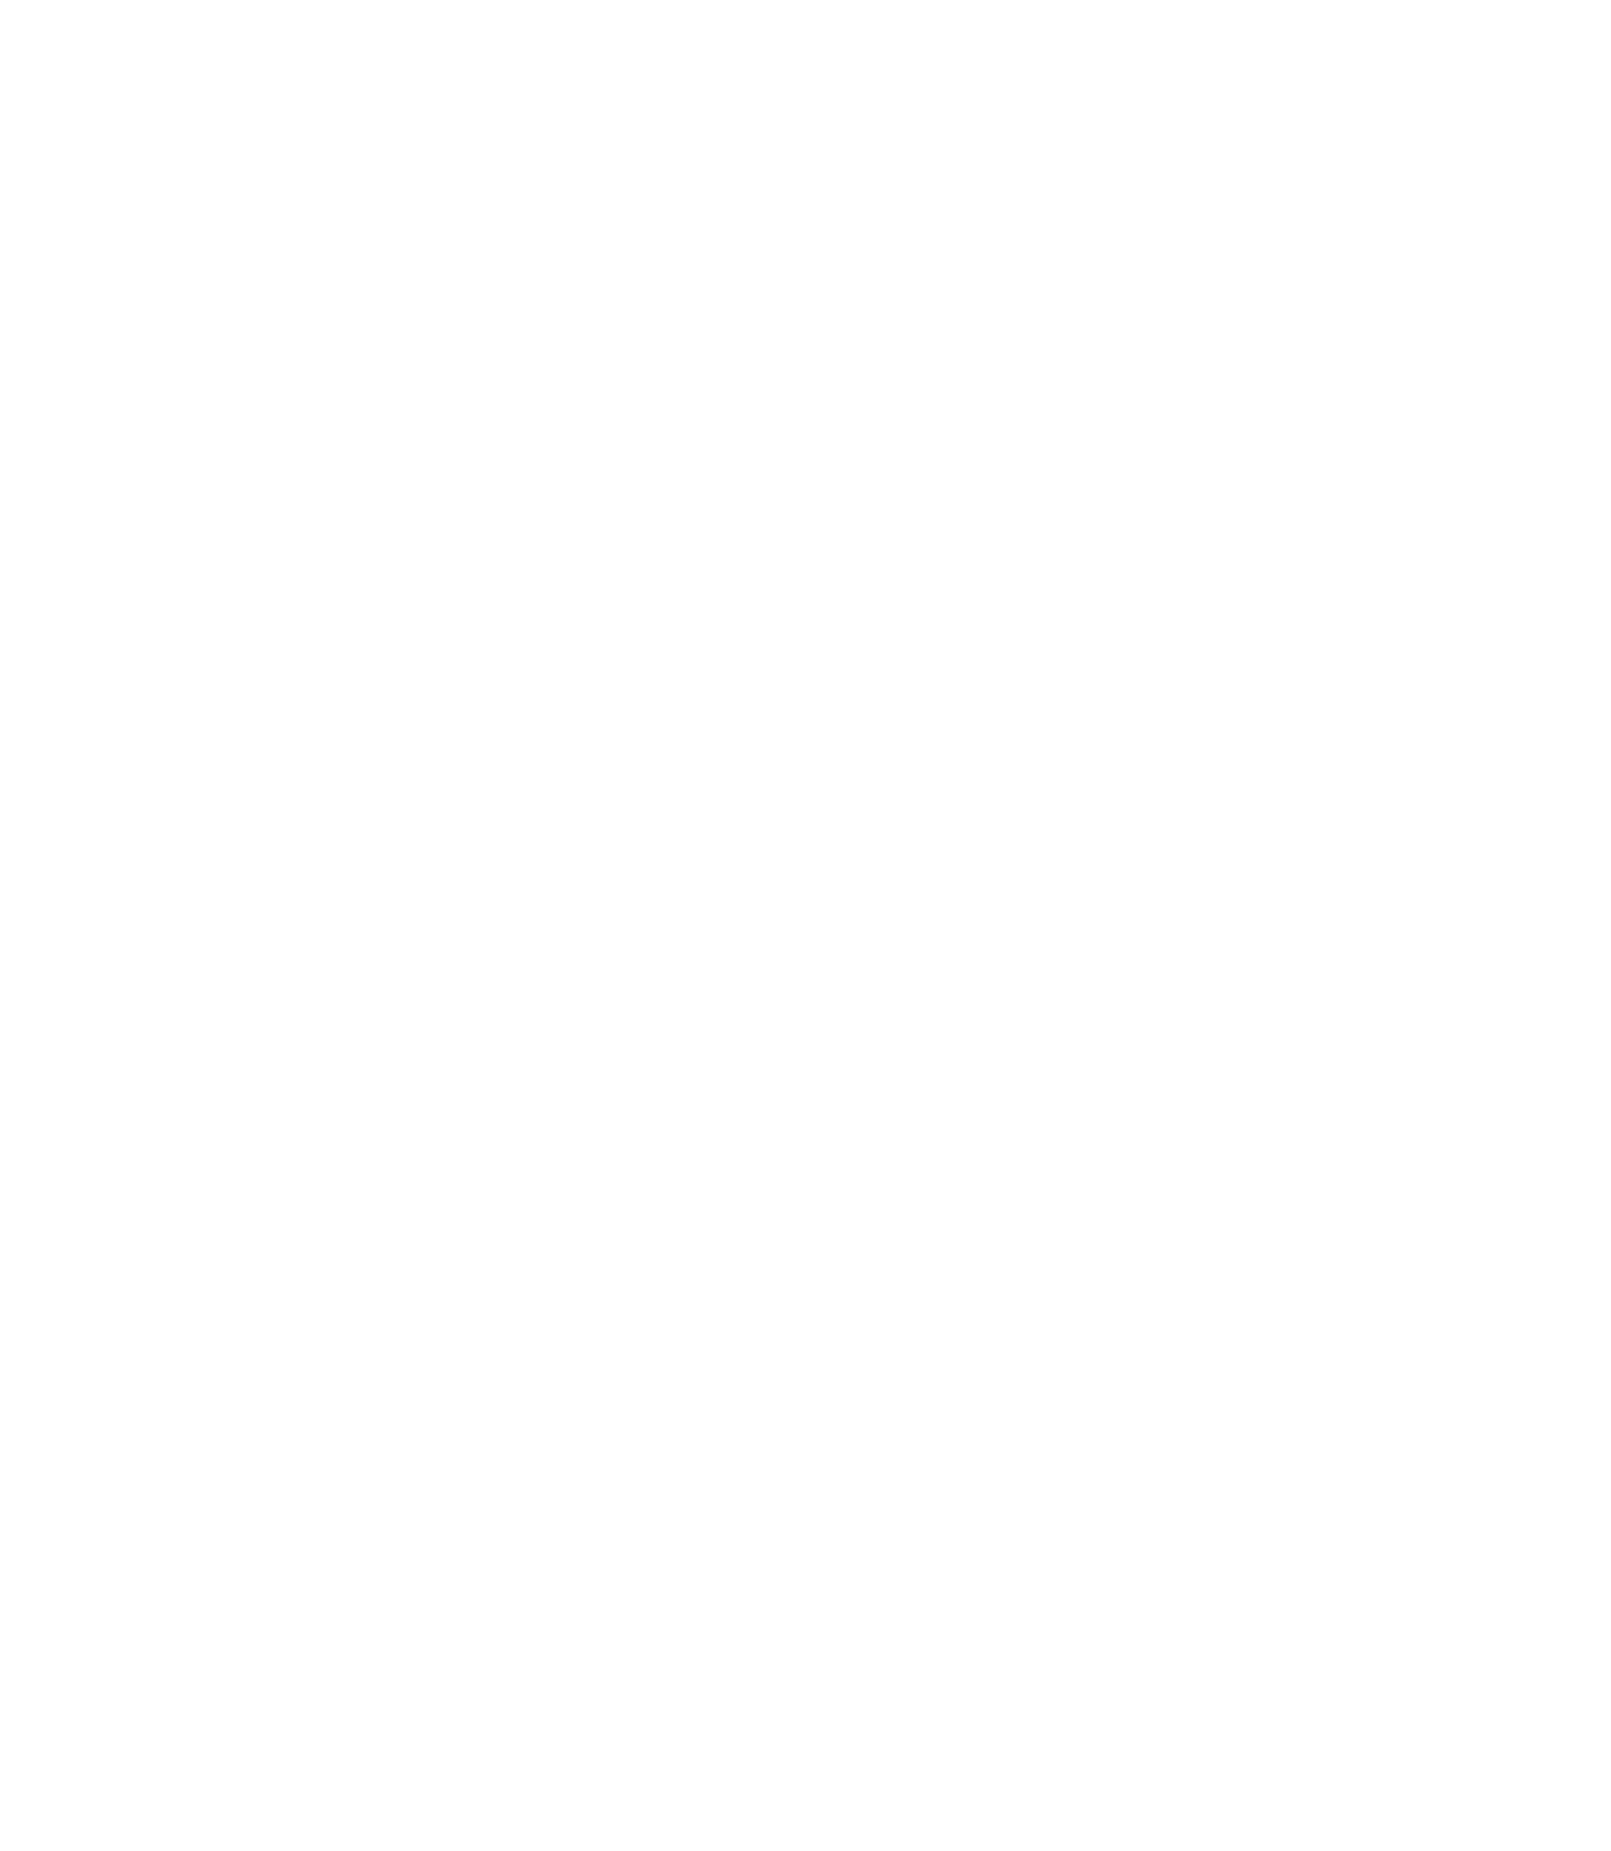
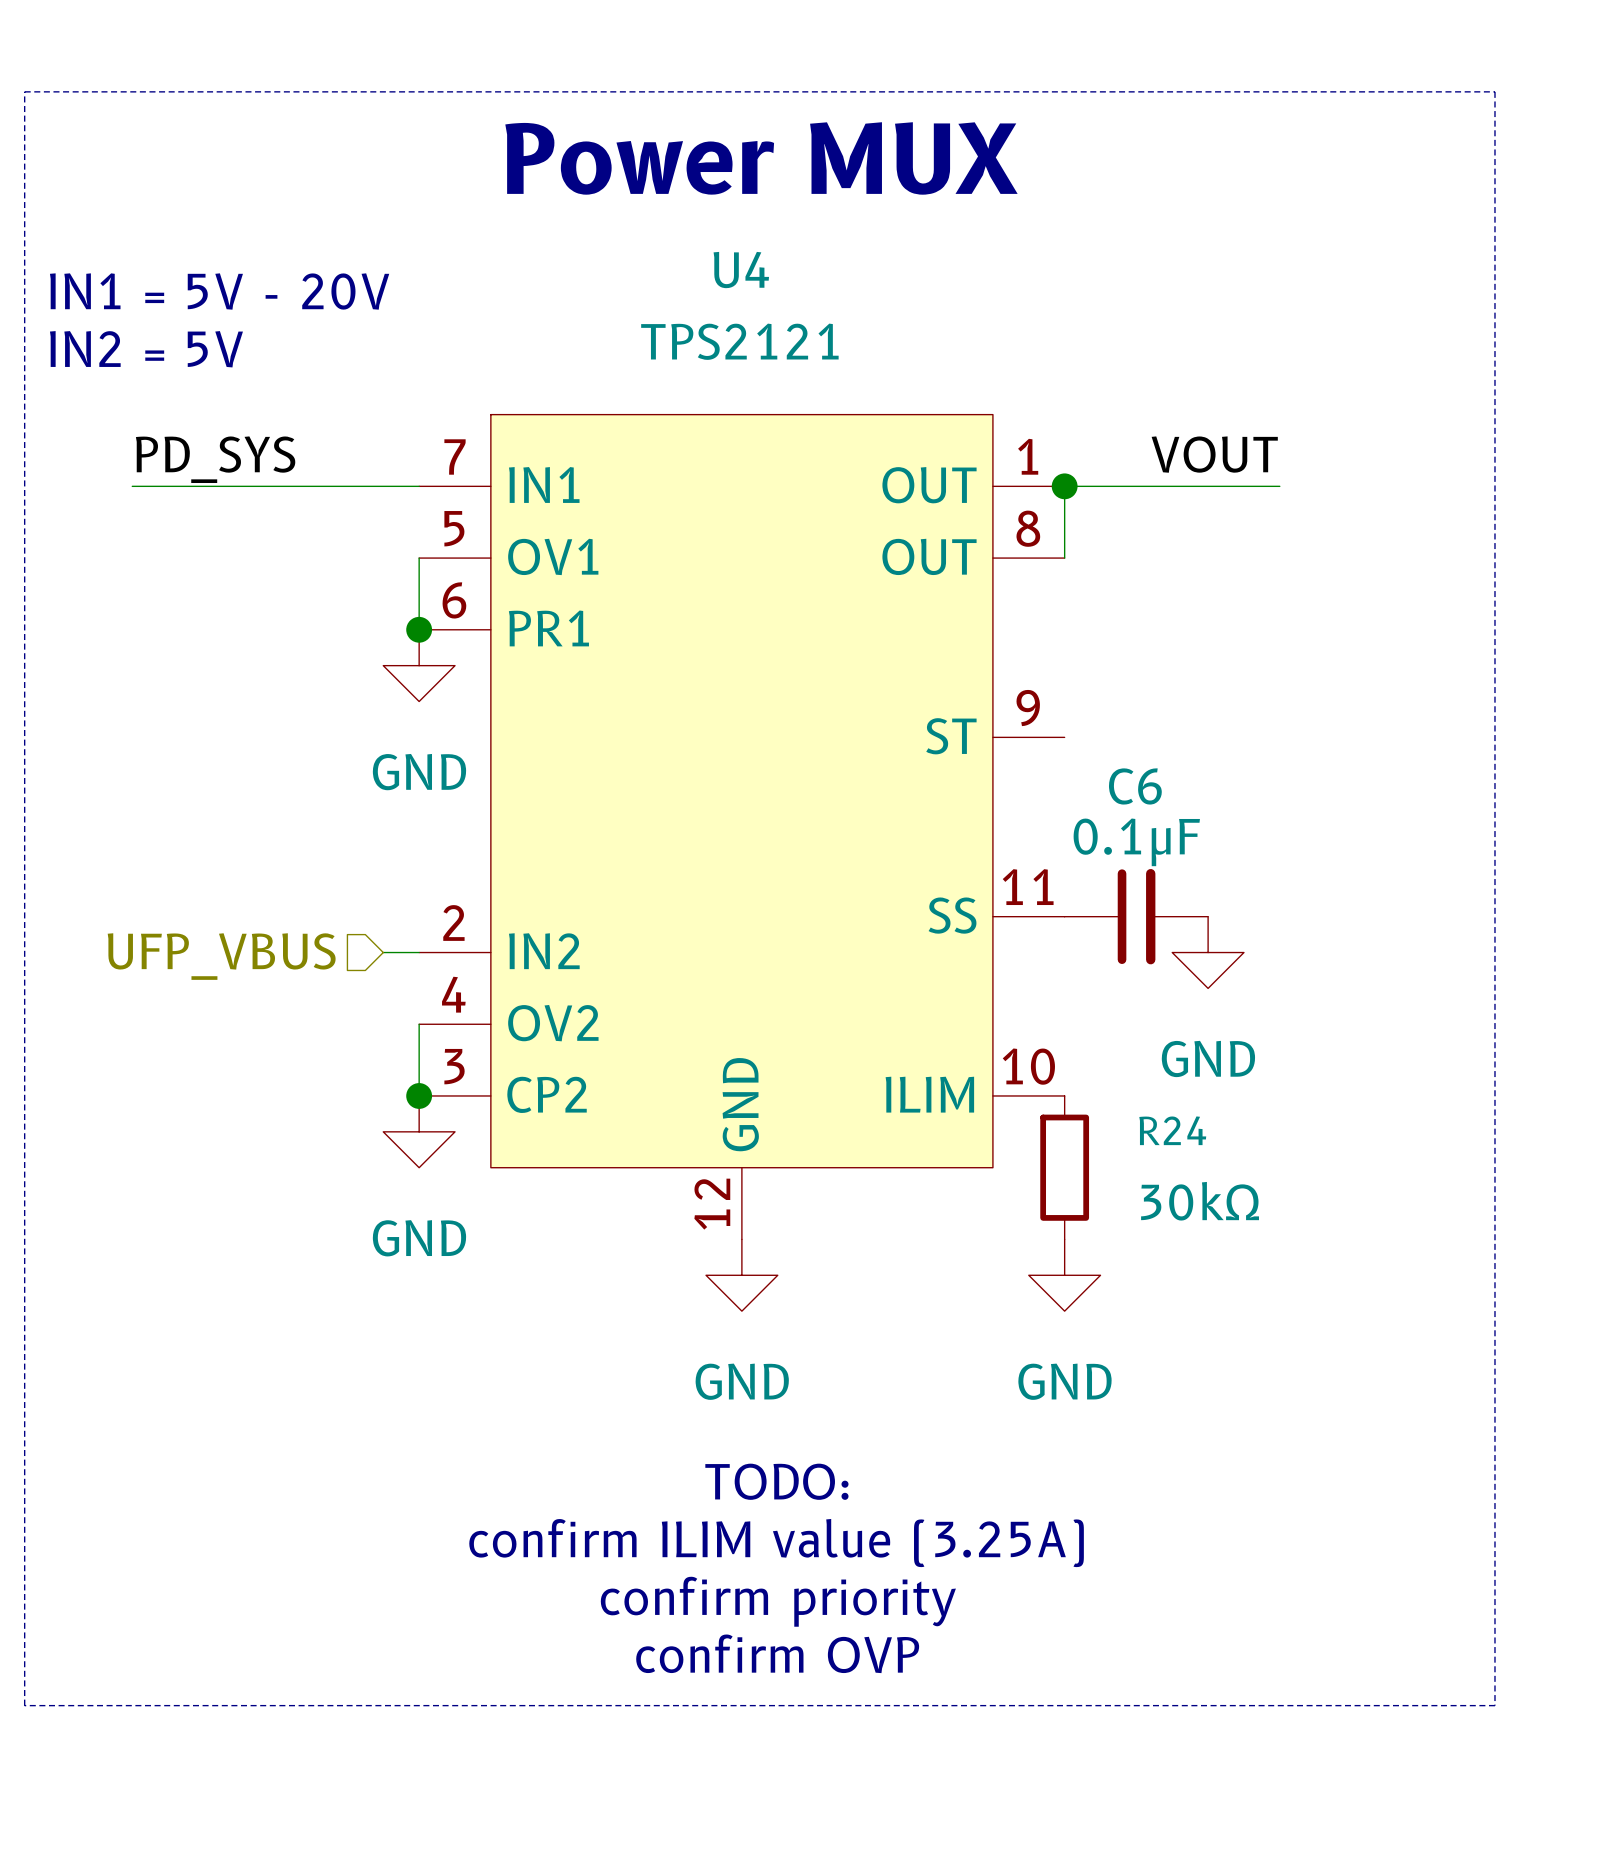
line: none -> (24, 91) (1494, 91) (1494, 1705) (24, 1705) (24, 91)
text: none -> Power MUX (761, 158)
text: none -> IN1 = 5V - 20V (219, 291)
text: none -> IN2 = 5V (146, 349)
label: none -> VOUT (1214, 454)
label: none -> PD_SYS (215, 459)
wire: none -> (132, 486) (419, 486)
junction: none -> (1064, 486)
wire: none -> (1279, 486) (1064, 486) (1064, 558)
wire: none -> (419, 558) (419, 629)
junction: none -> (419, 629)
power symbol: none -> GND (419, 665)
U4: none -> TPS2121 (741, 827)
C6: none -> 0.1μF (1136, 916)
hierarchical label: none -> UFP_VBUS (221, 956)
wire: none -> (383, 952) (419, 952)
power symbol: none -> GND (1208, 952)
wire: none -> (419, 1024) (419, 1095)
junction: none -> (419, 1095)
power symbol: none -> GND (419, 1131)
R24: none -> 30kΩ (1064, 1167)
power symbol: none -> GND (741, 1275)
power symbol: none -> GND (1064, 1275)
text: none -> TODO: (776, 1481)
text: none -> confirm ILIM value (3.25A) (776, 1543)
text: none -> confirm priority (778, 1601)
text: none -> confirm OVP (777, 1653)

